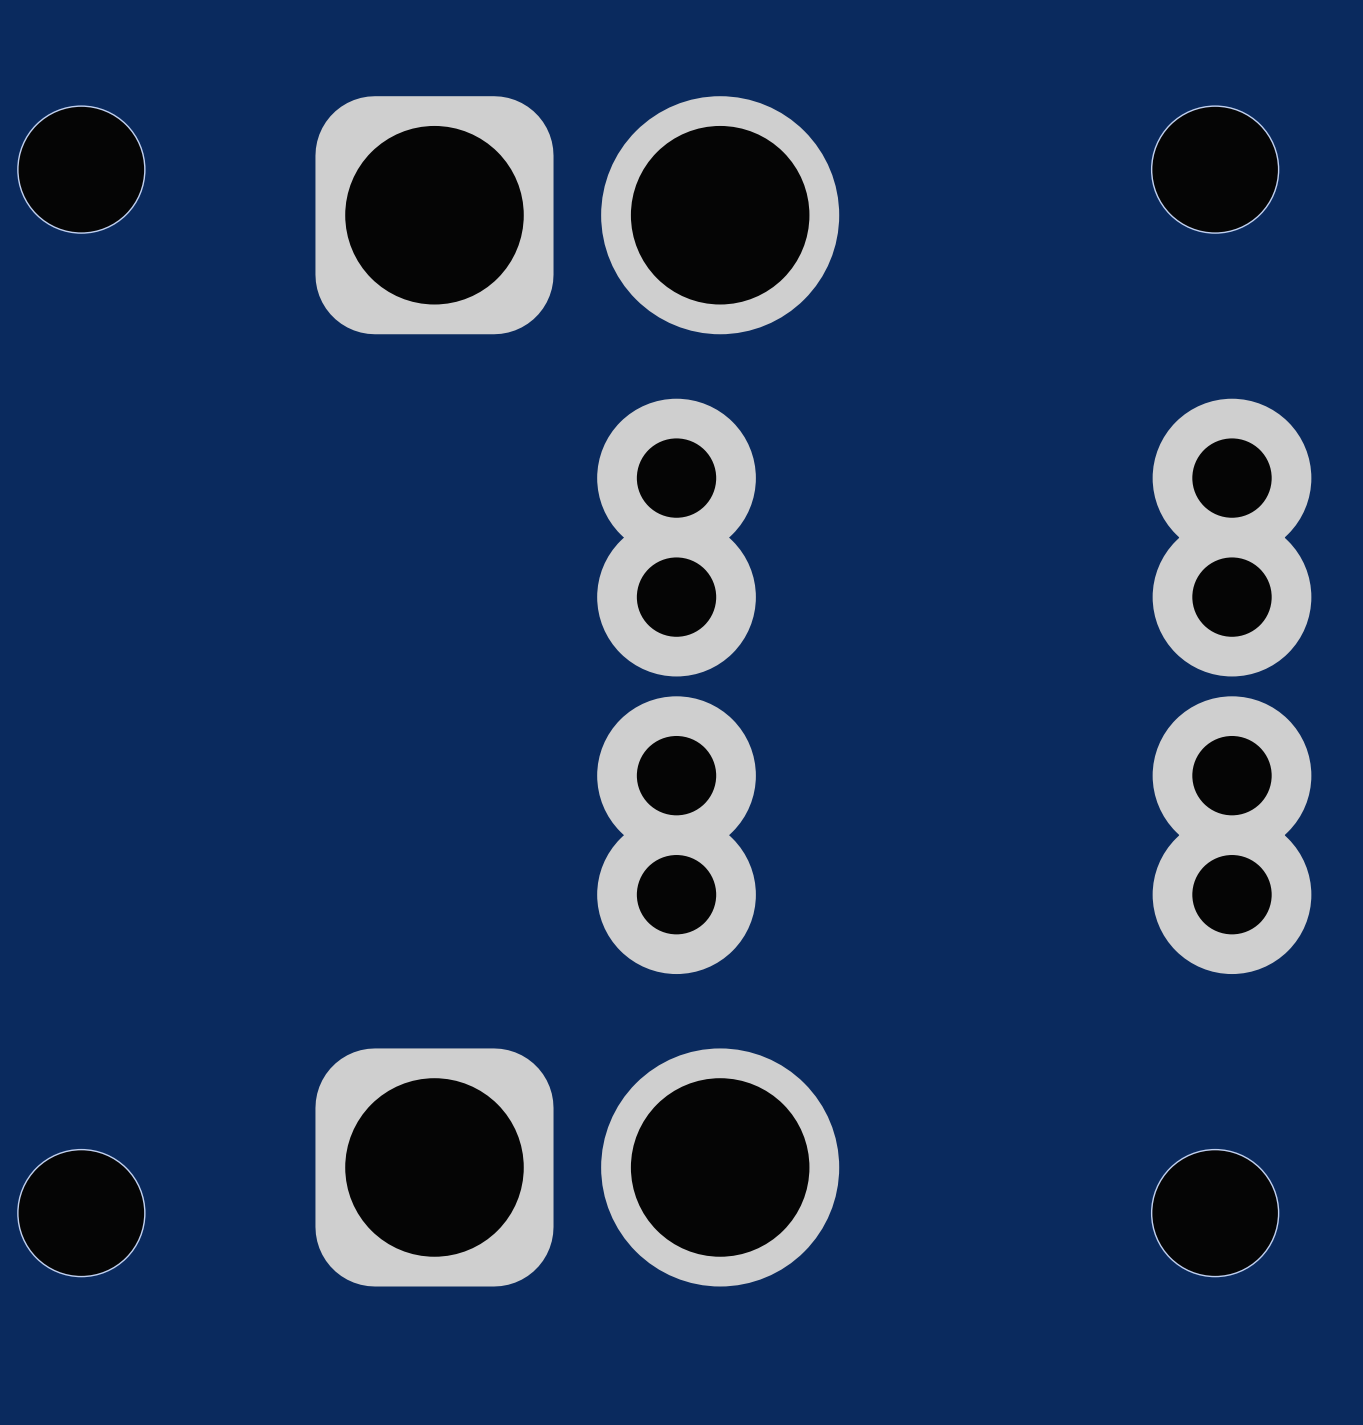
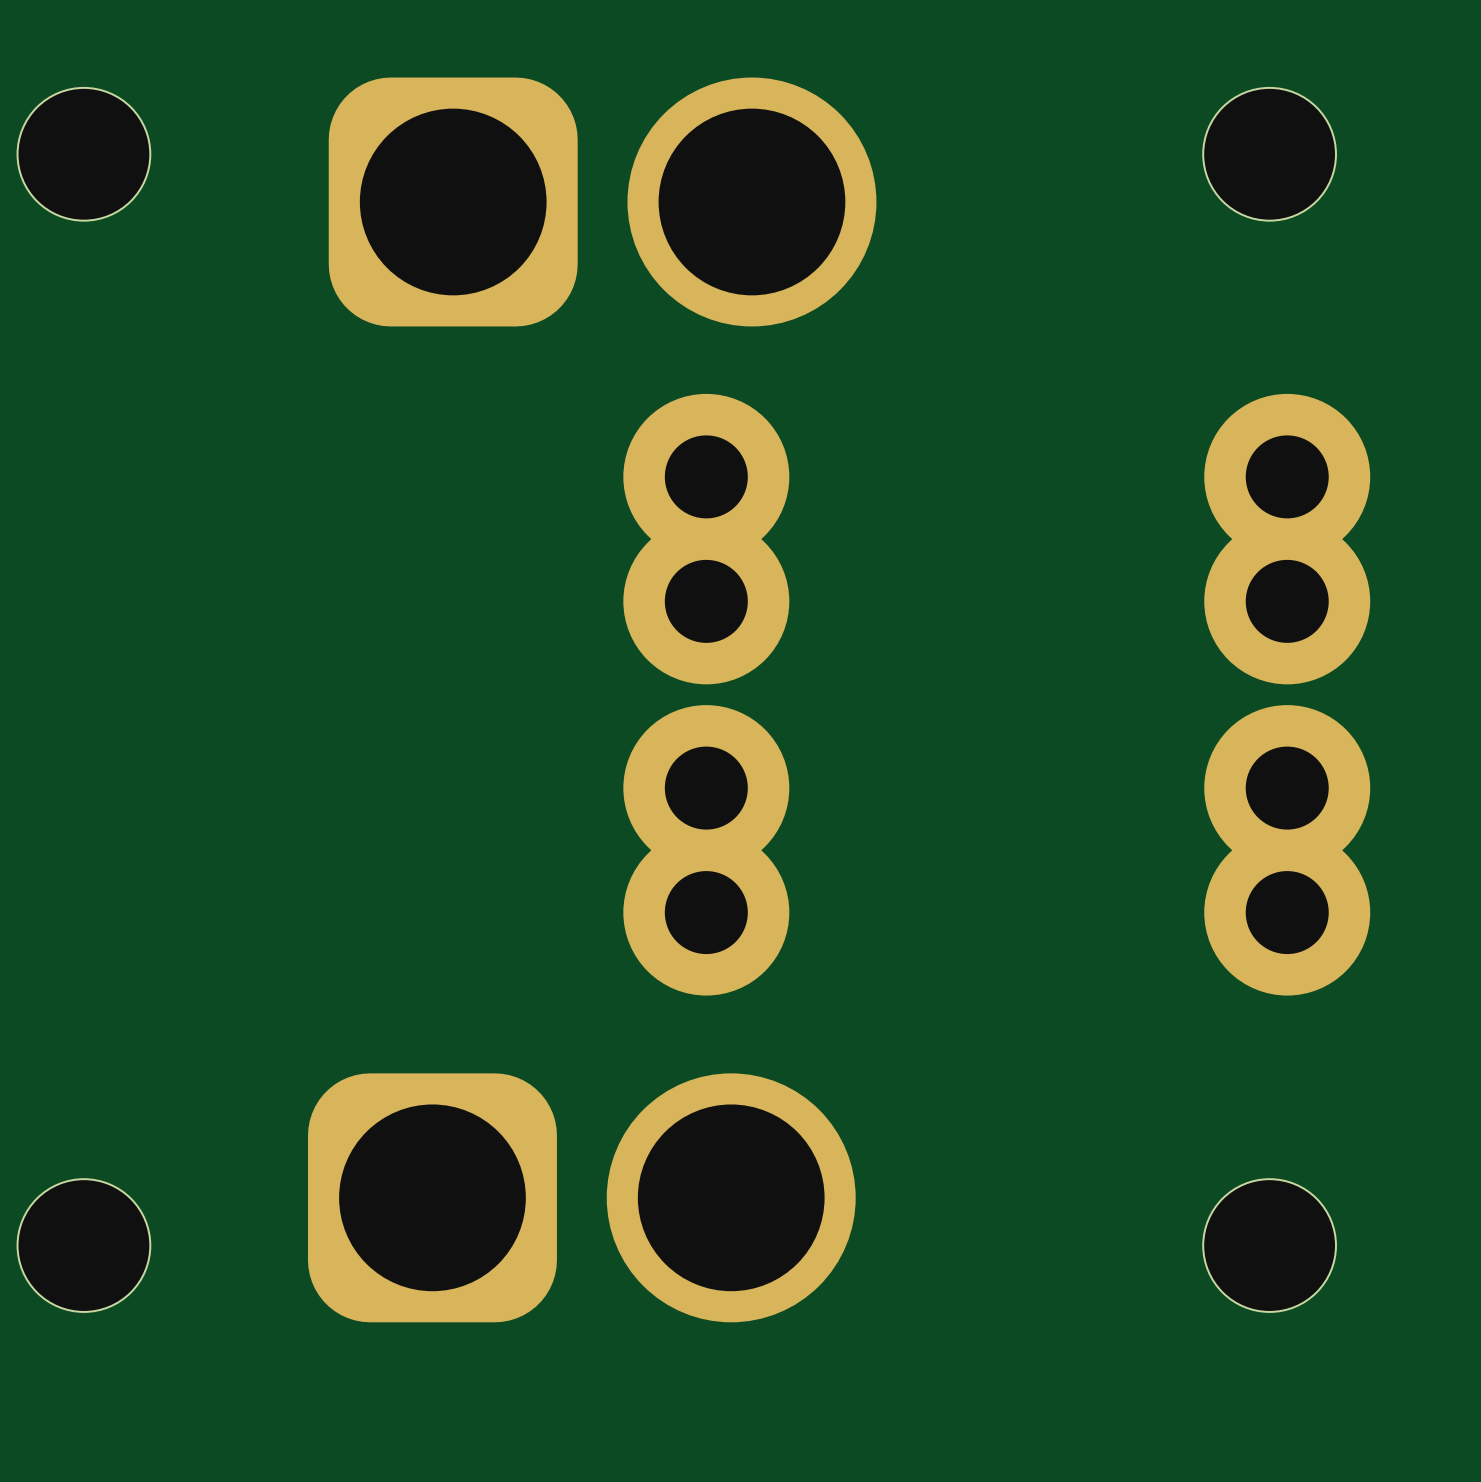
part position: (577, 1167) -> (581, 1197)

